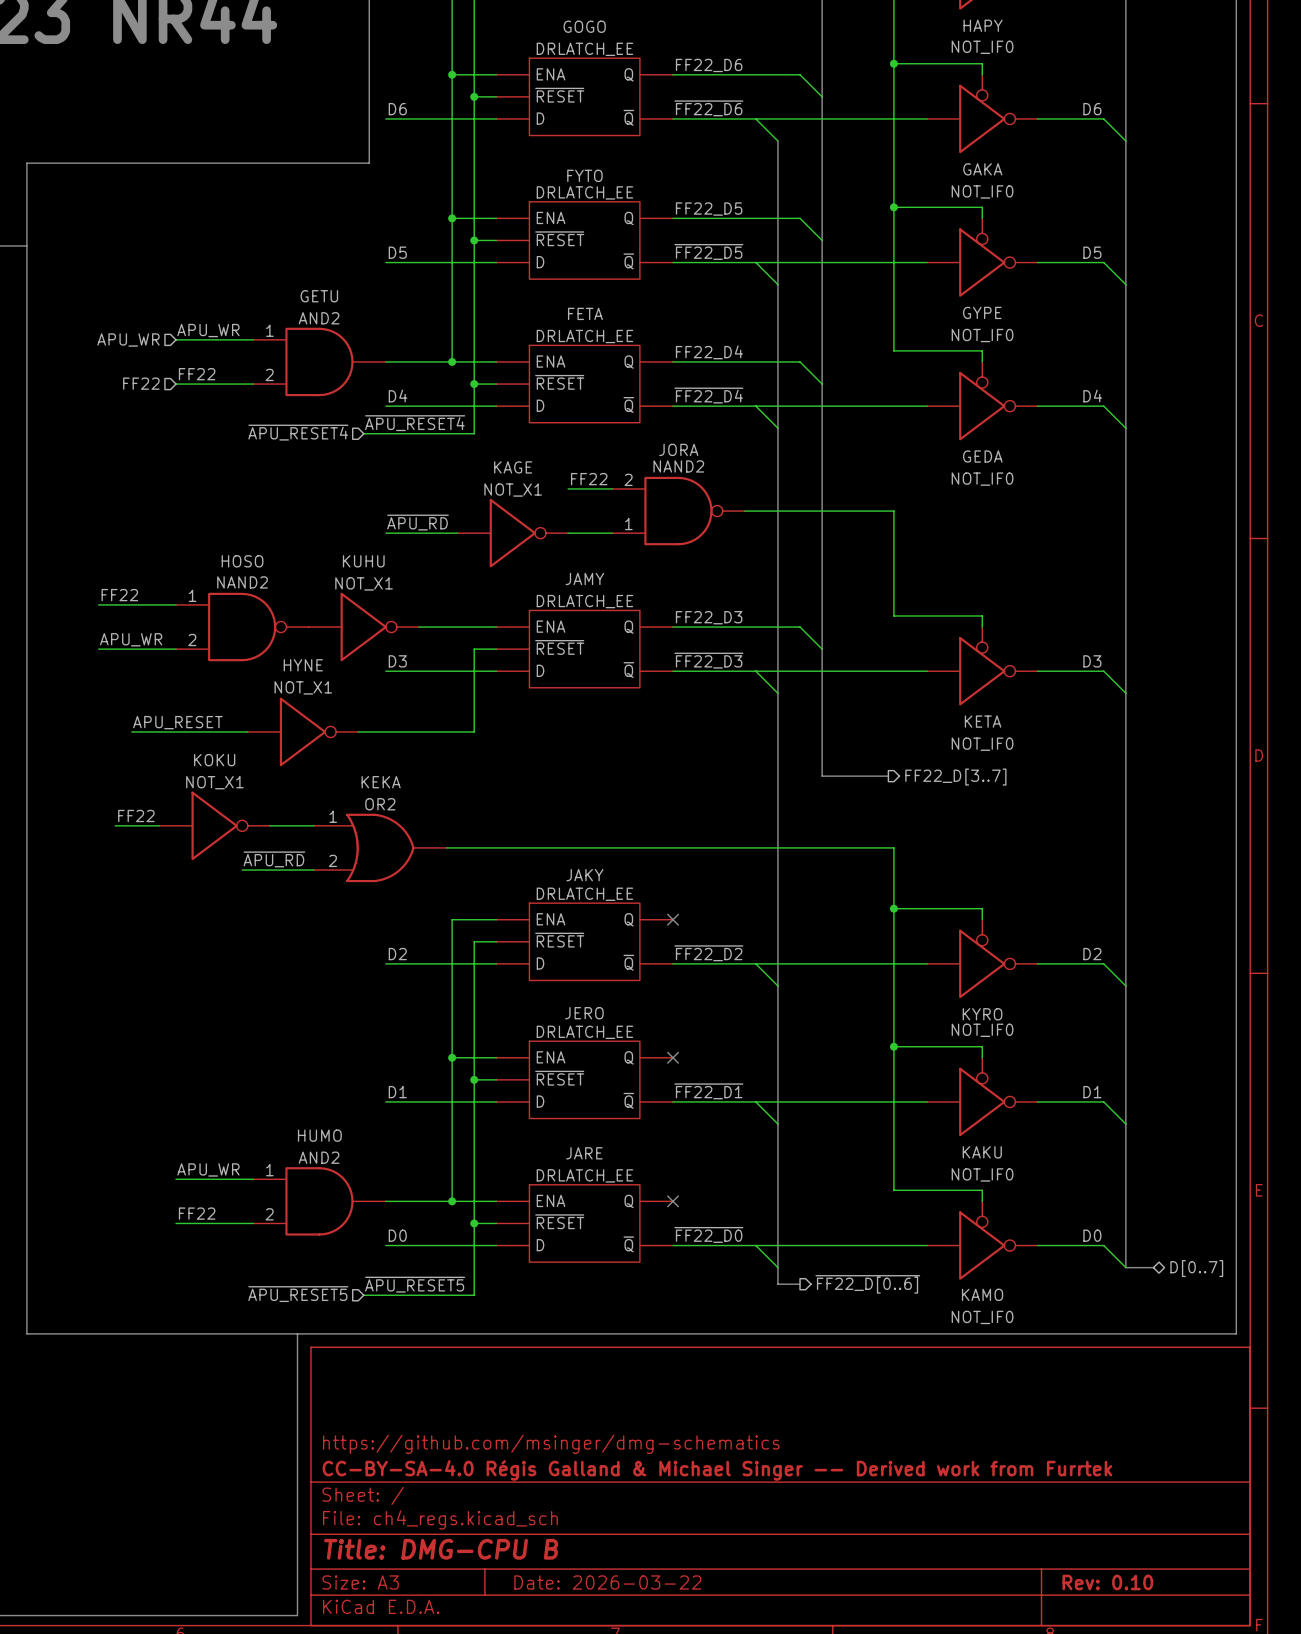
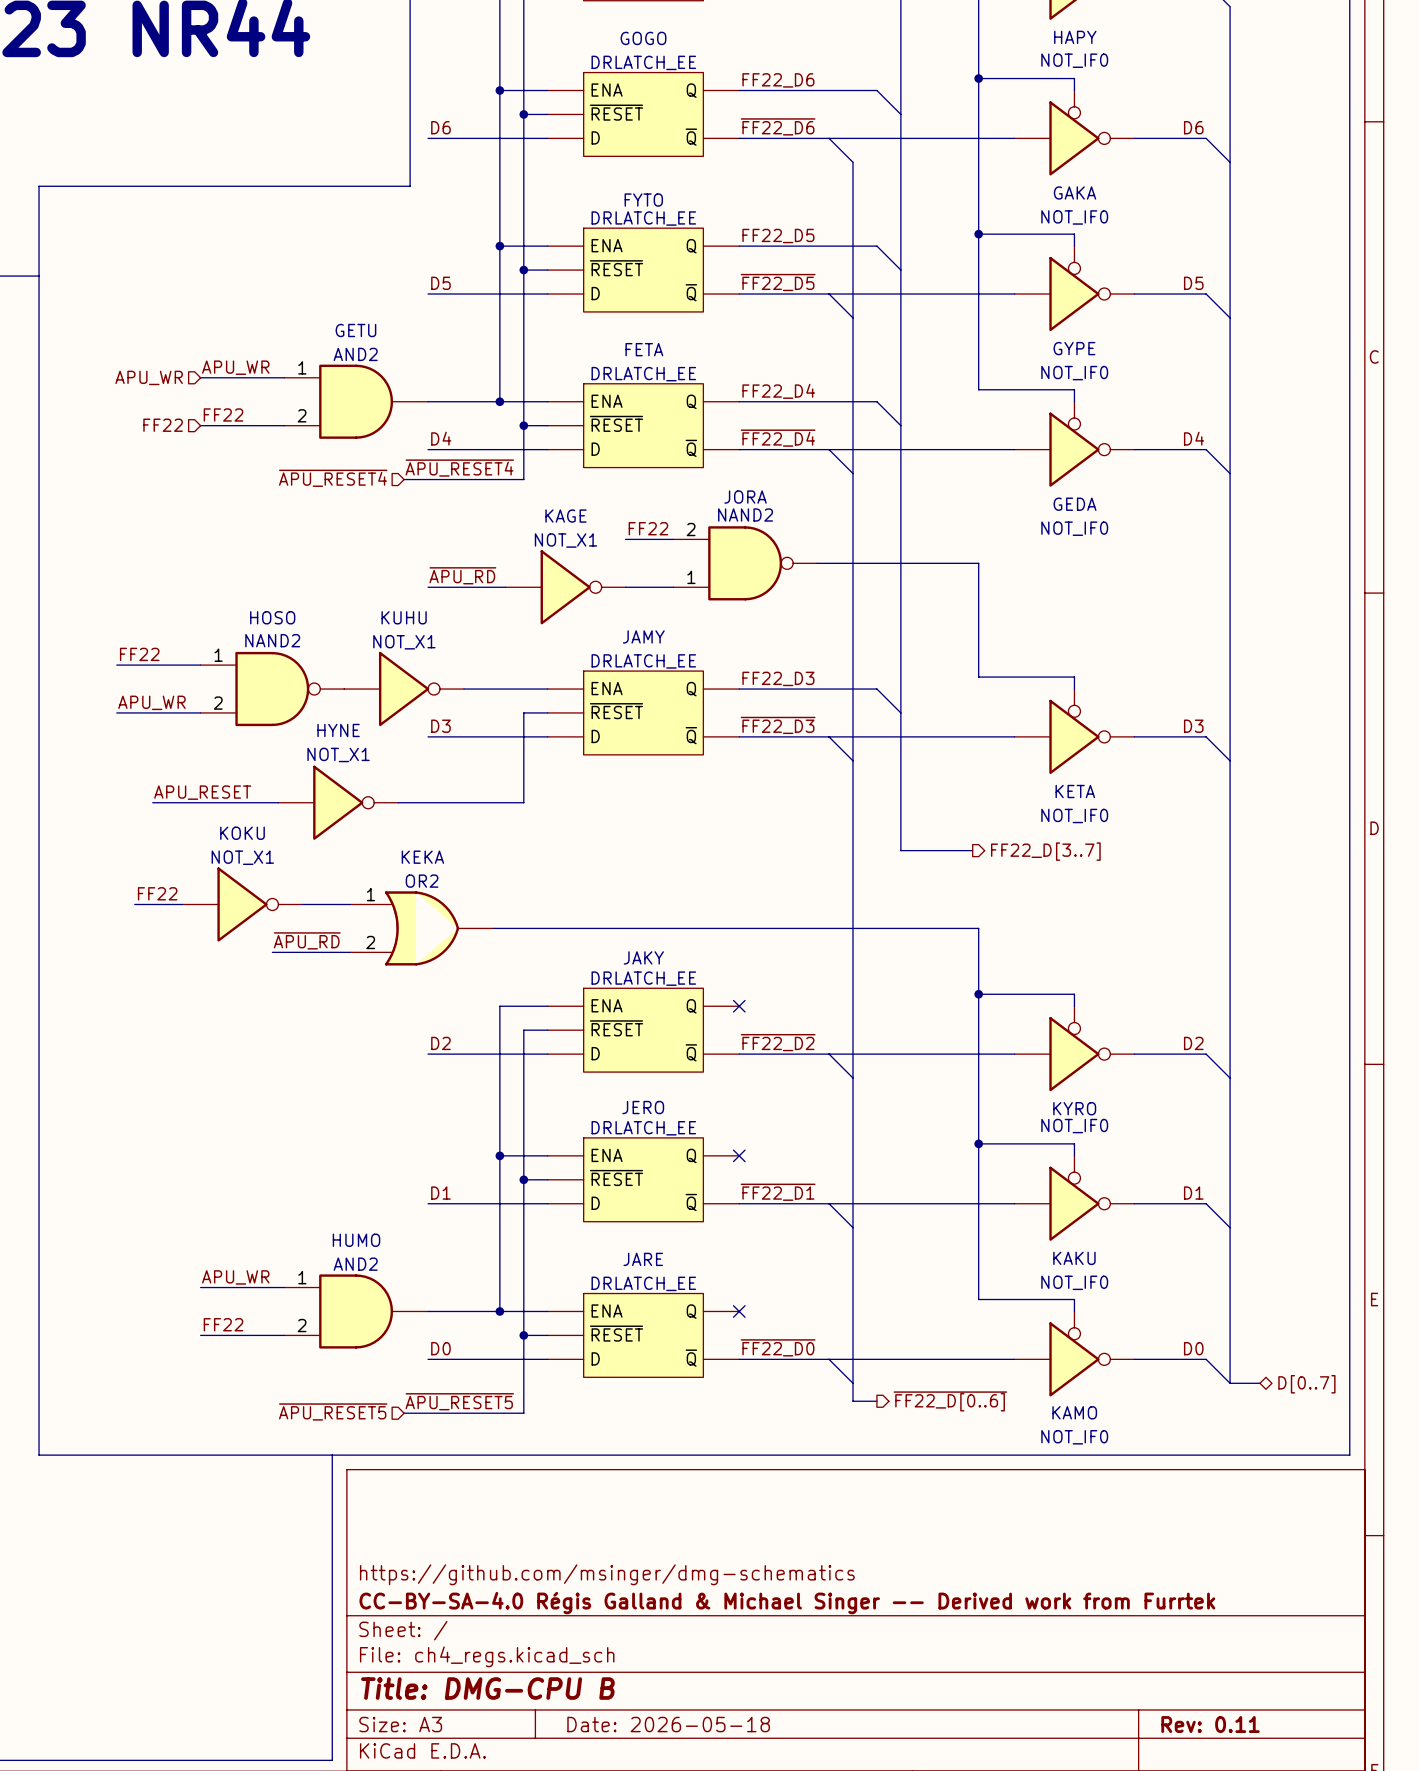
title block: Date: 2026-03-22 (607, 1582) -> Date: 2026-05-18 (668, 1724)
title block: Rev: 0.10 (1107, 1582) -> Rev: 0.11 (1210, 1724)

